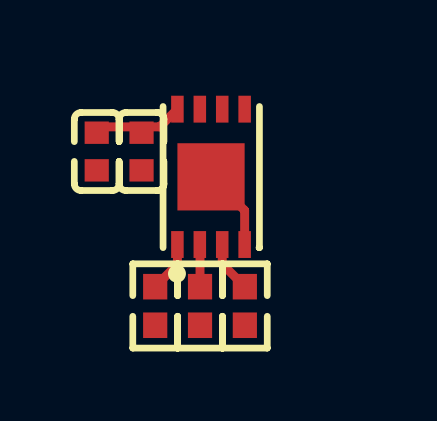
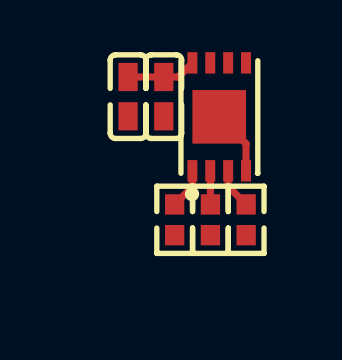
part footprint: [70, 109, 123, 194] -> [107, 52, 149, 142]
part footprint: [115, 109, 168, 194] -> [143, 52, 185, 142]

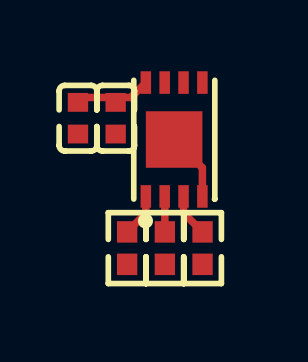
part footprint: [107, 52, 149, 142] -> [56, 82, 100, 154]
part footprint: [143, 52, 185, 142] -> [93, 82, 138, 154]

